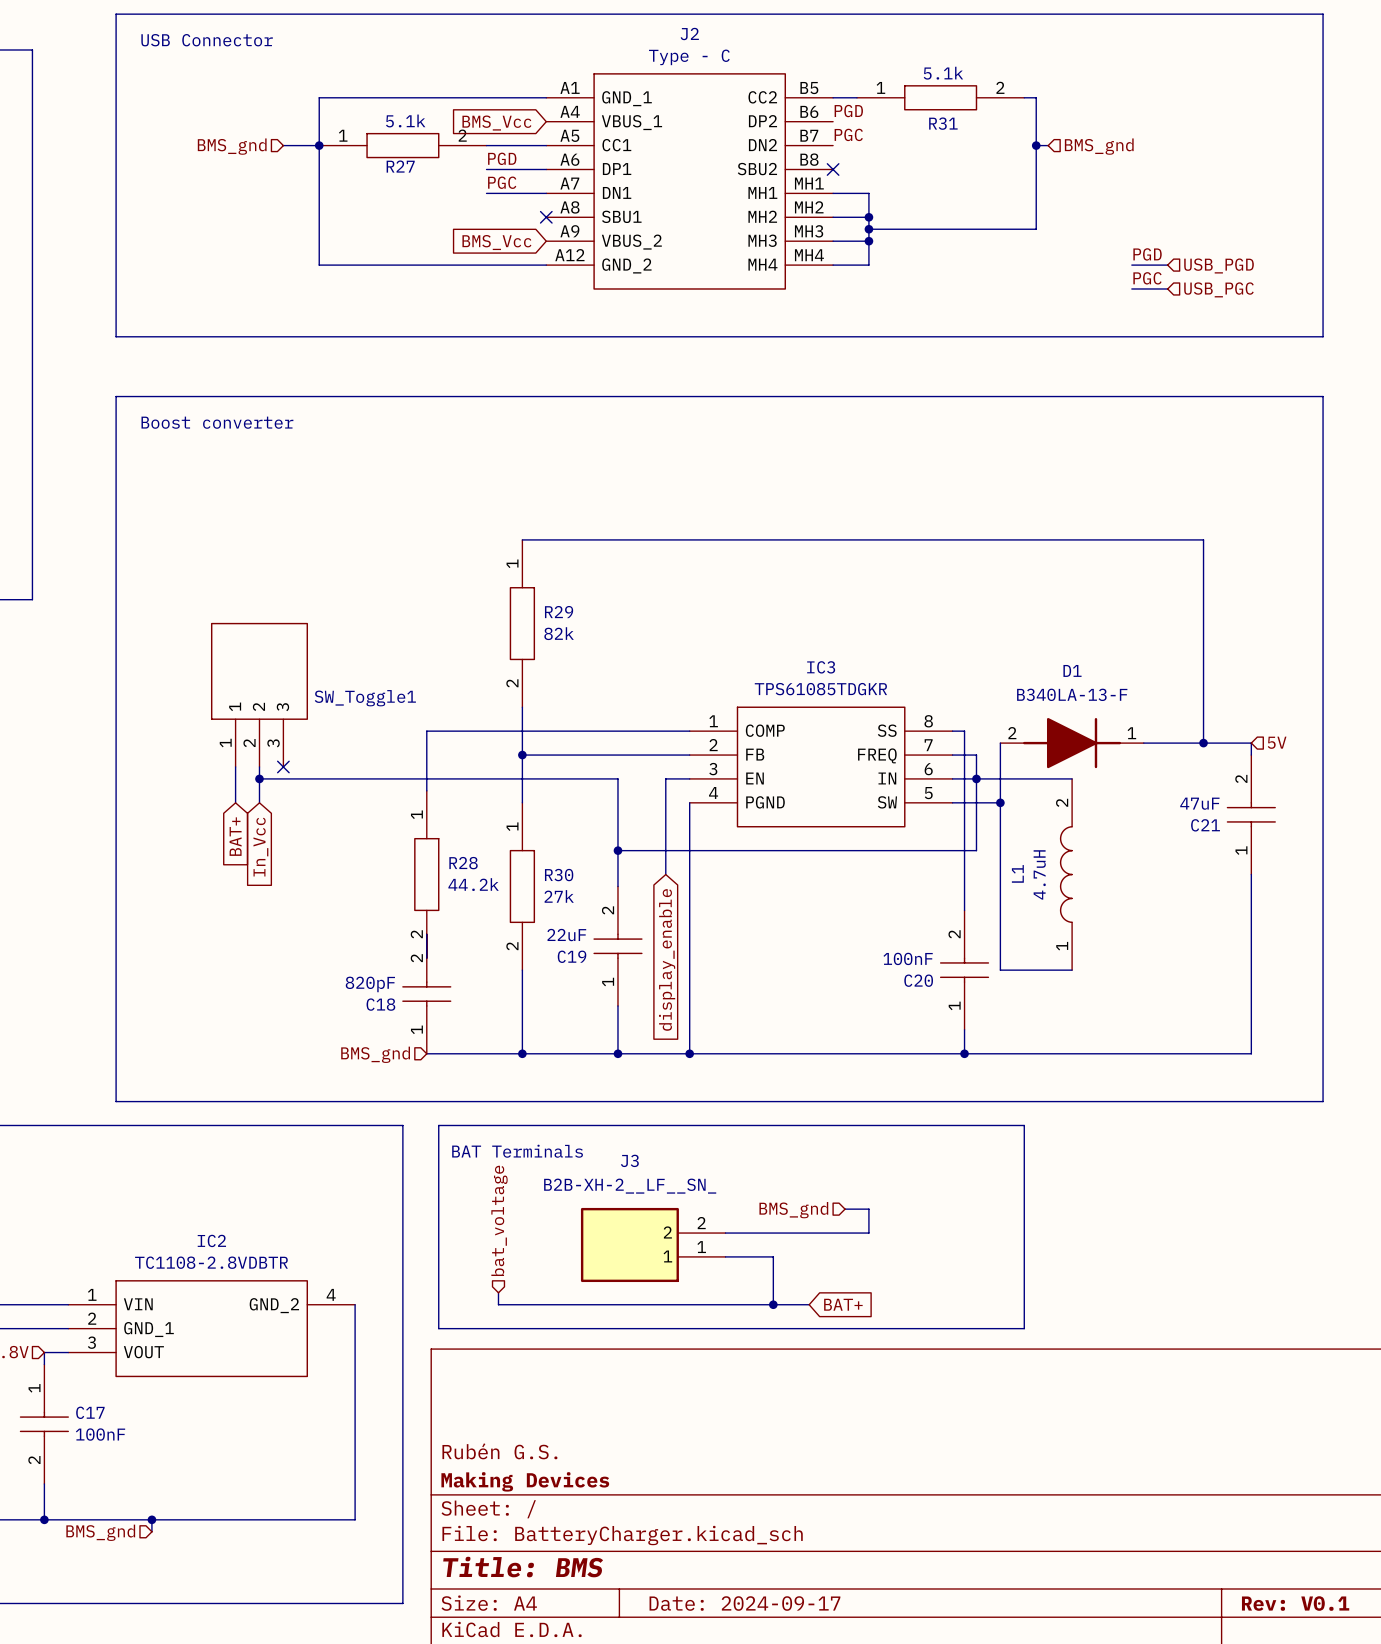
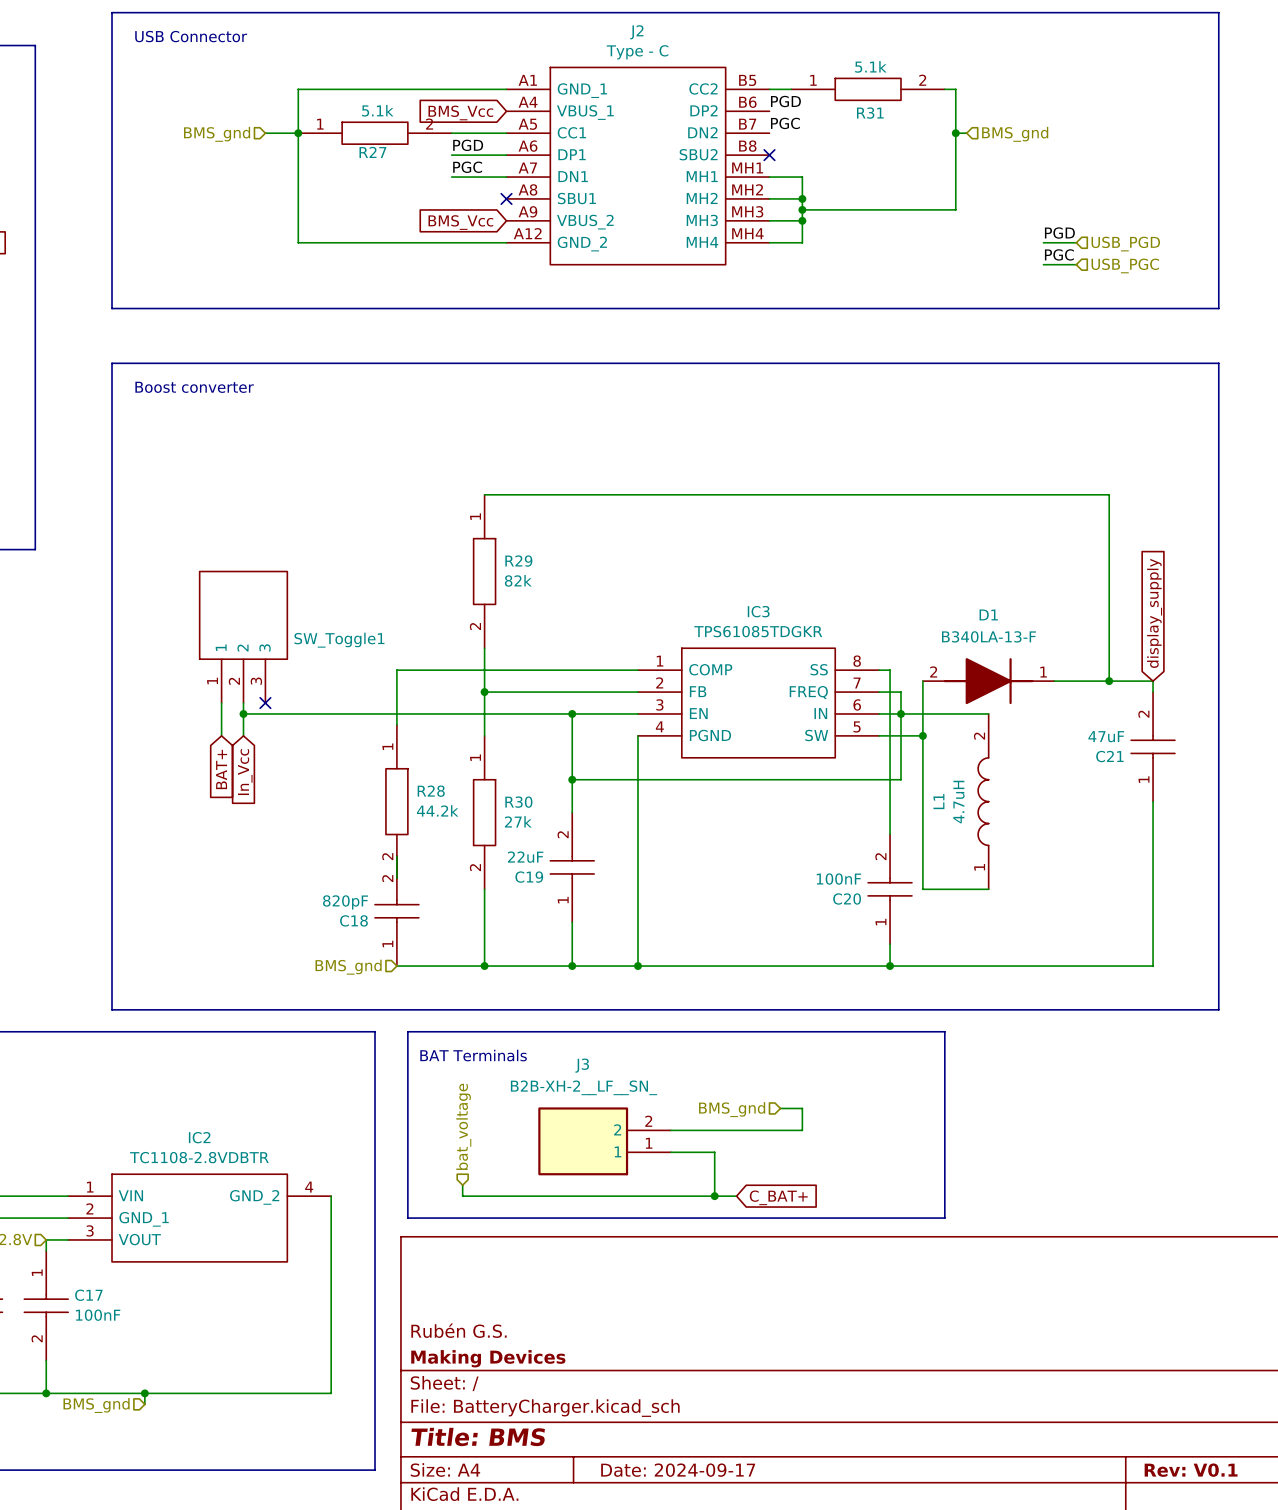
global label: none -> display_supply (1154, 613)
hierarchical label: 5V (1277, 742) -> none
junction: none -> (572, 713)
wire: (665, 778) (665, 874) -> (616, 713) (572, 713)
global label: display_enable (667, 959) -> none
wire: (797, 1304) (809, 1304) -> none
global label: BAT+ (843, 1304) -> C_BAT+ (778, 1197)

